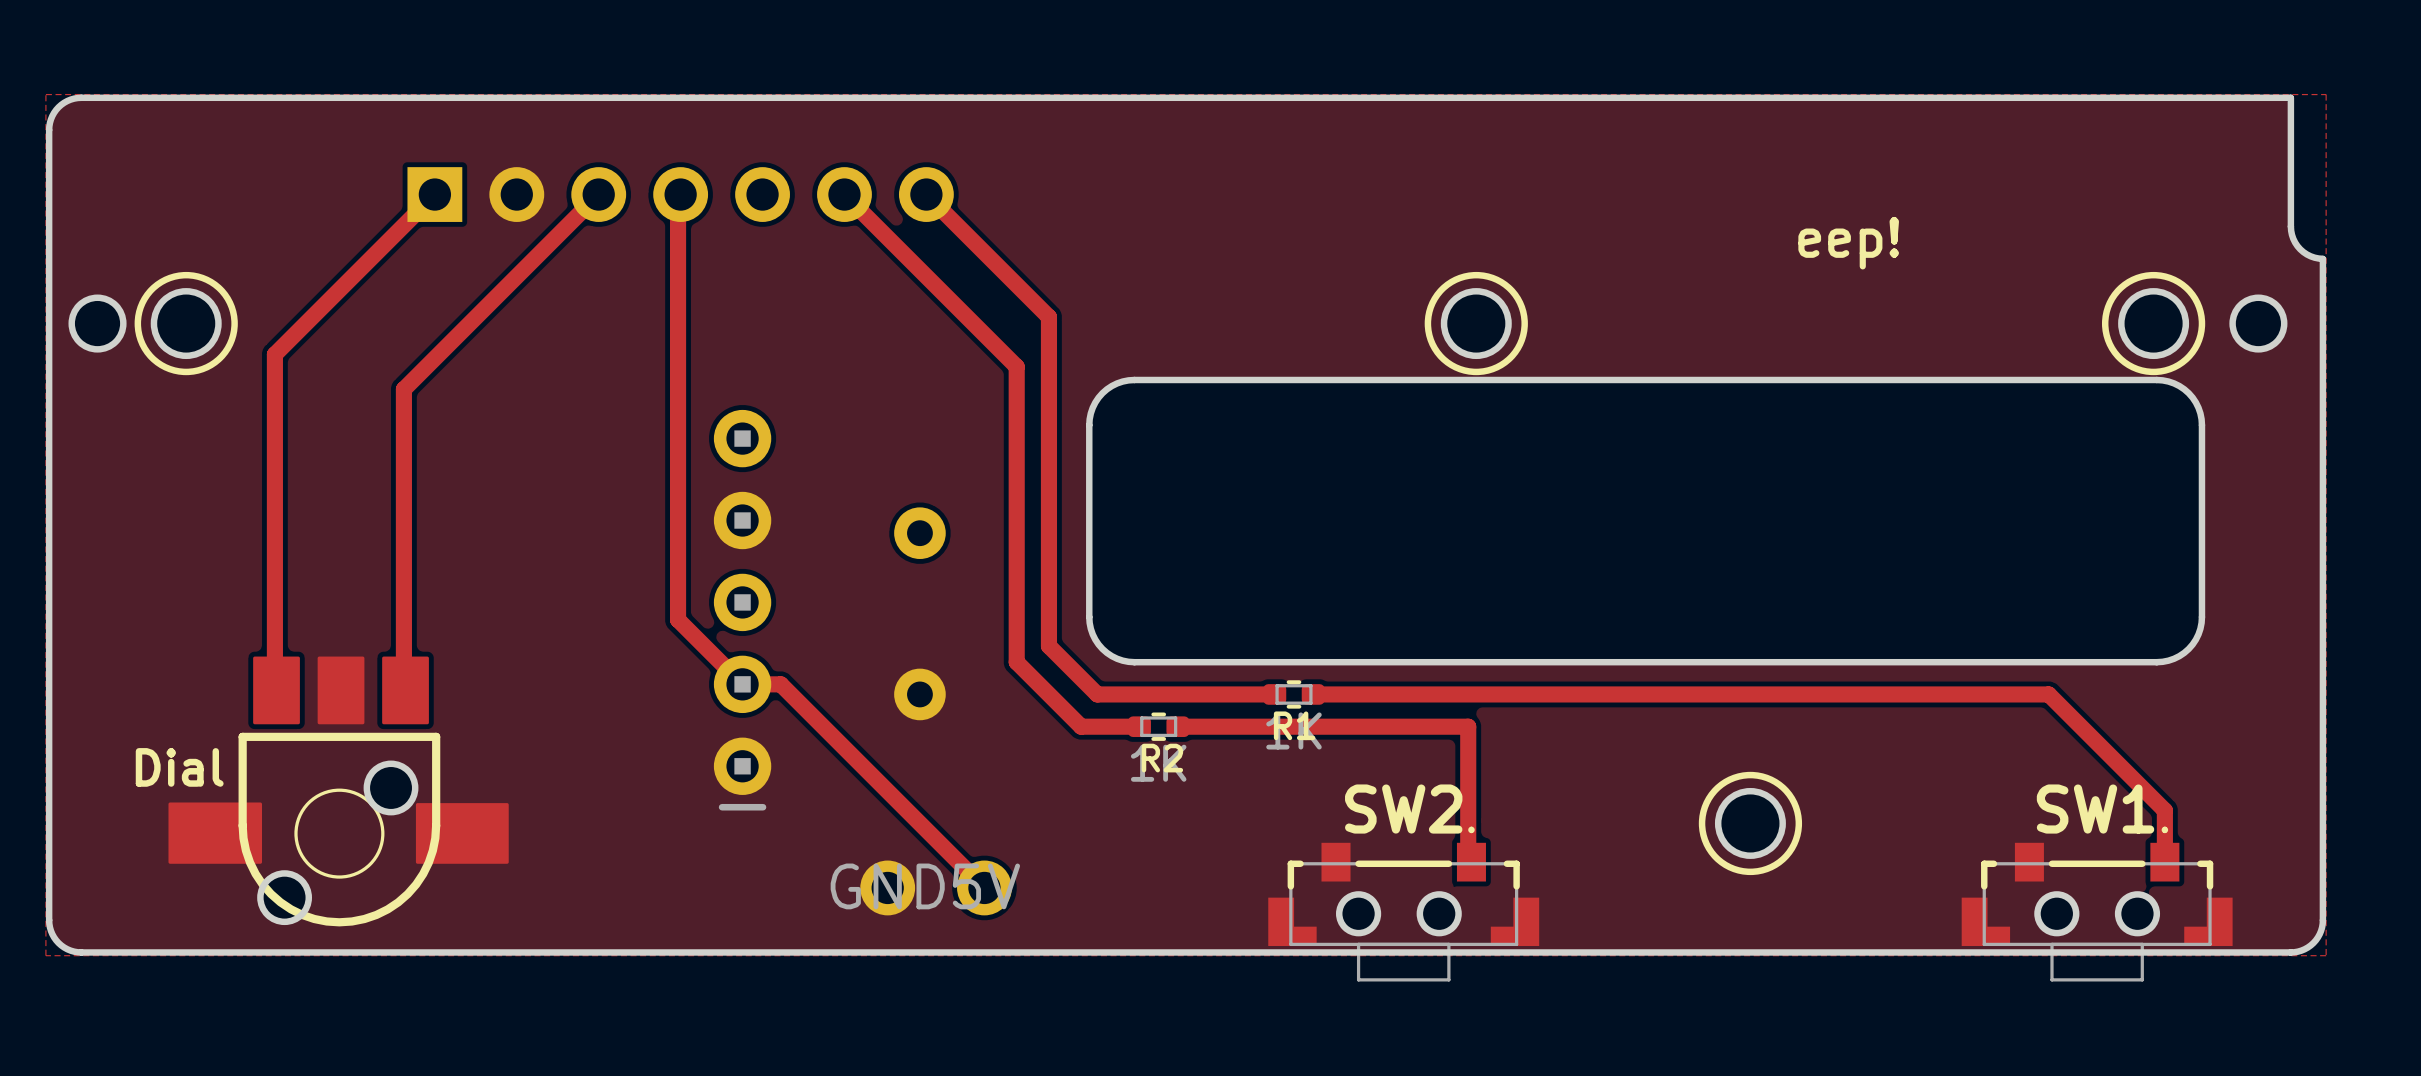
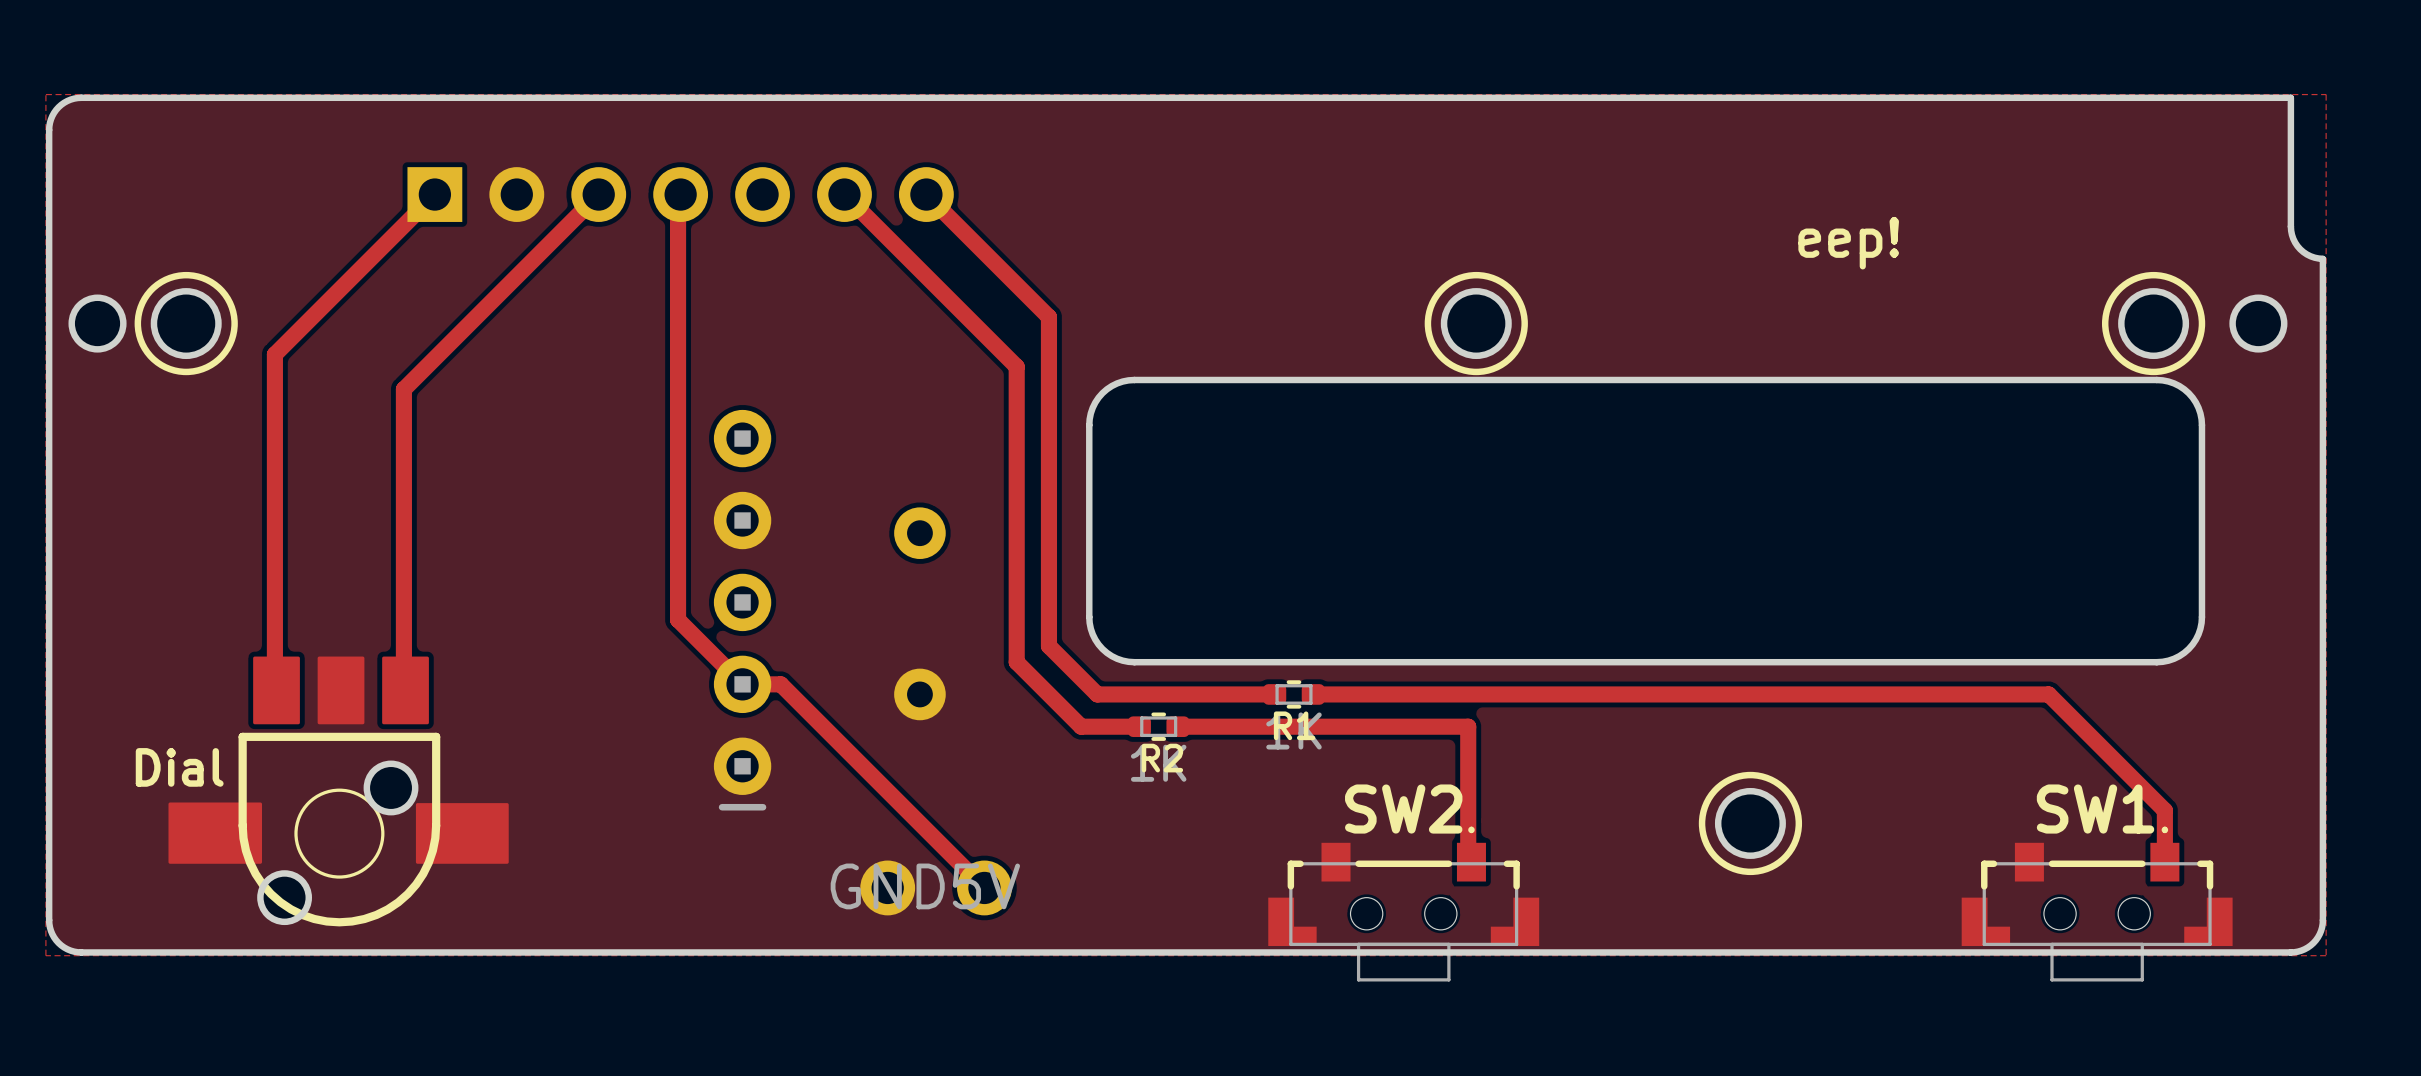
SW2 footprint: [1268, 826, 1540, 982] -> [1268, 826, 1540, 982]
SW1 footprint: [1961, 826, 2233, 982] -> [1961, 826, 2233, 982]
round board edge: [1336, 891, 1382, 937] -> none
round board edge: [1416, 891, 1462, 937] -> none
round board edge: [2034, 891, 2080, 937] -> none
round board edge: [2114, 891, 2161, 937] -> none

